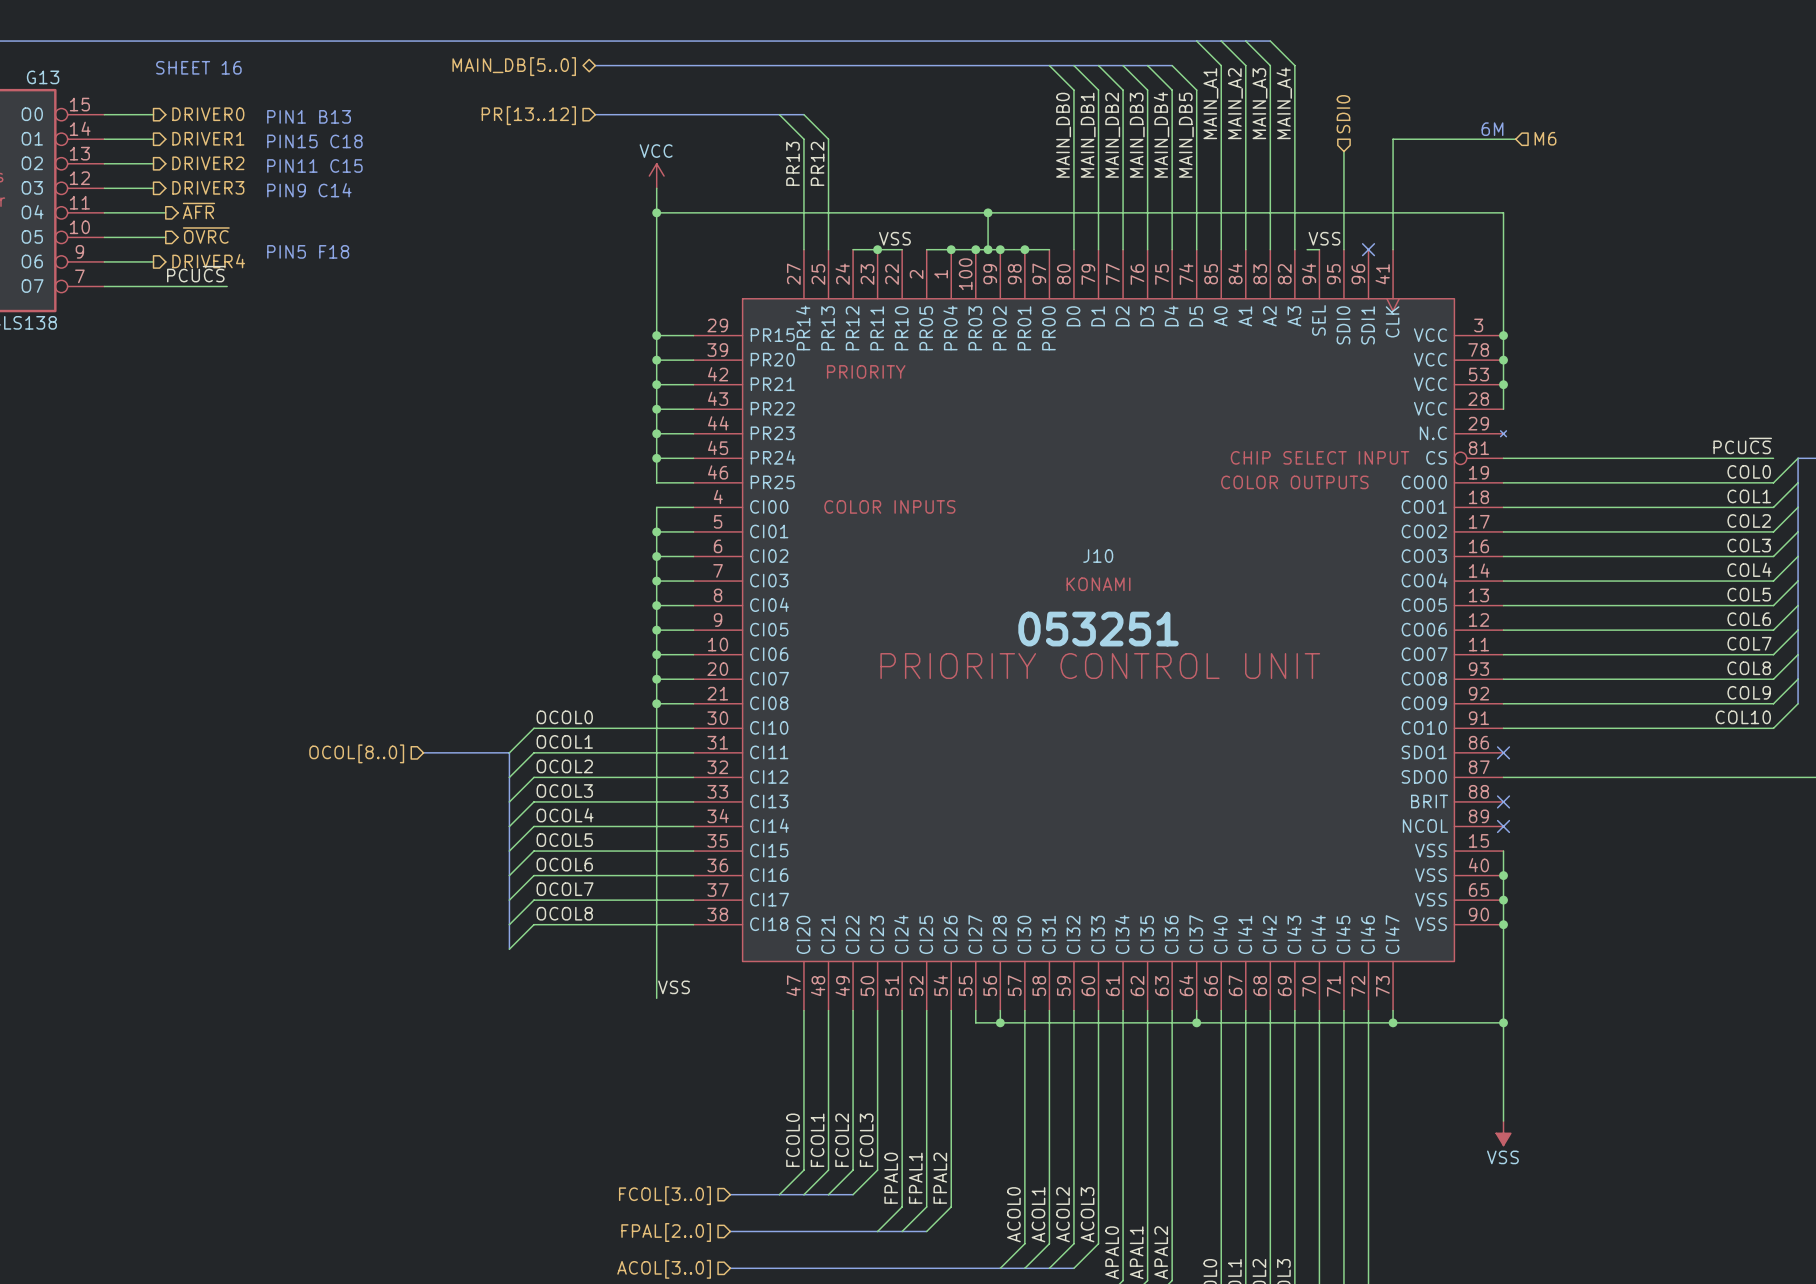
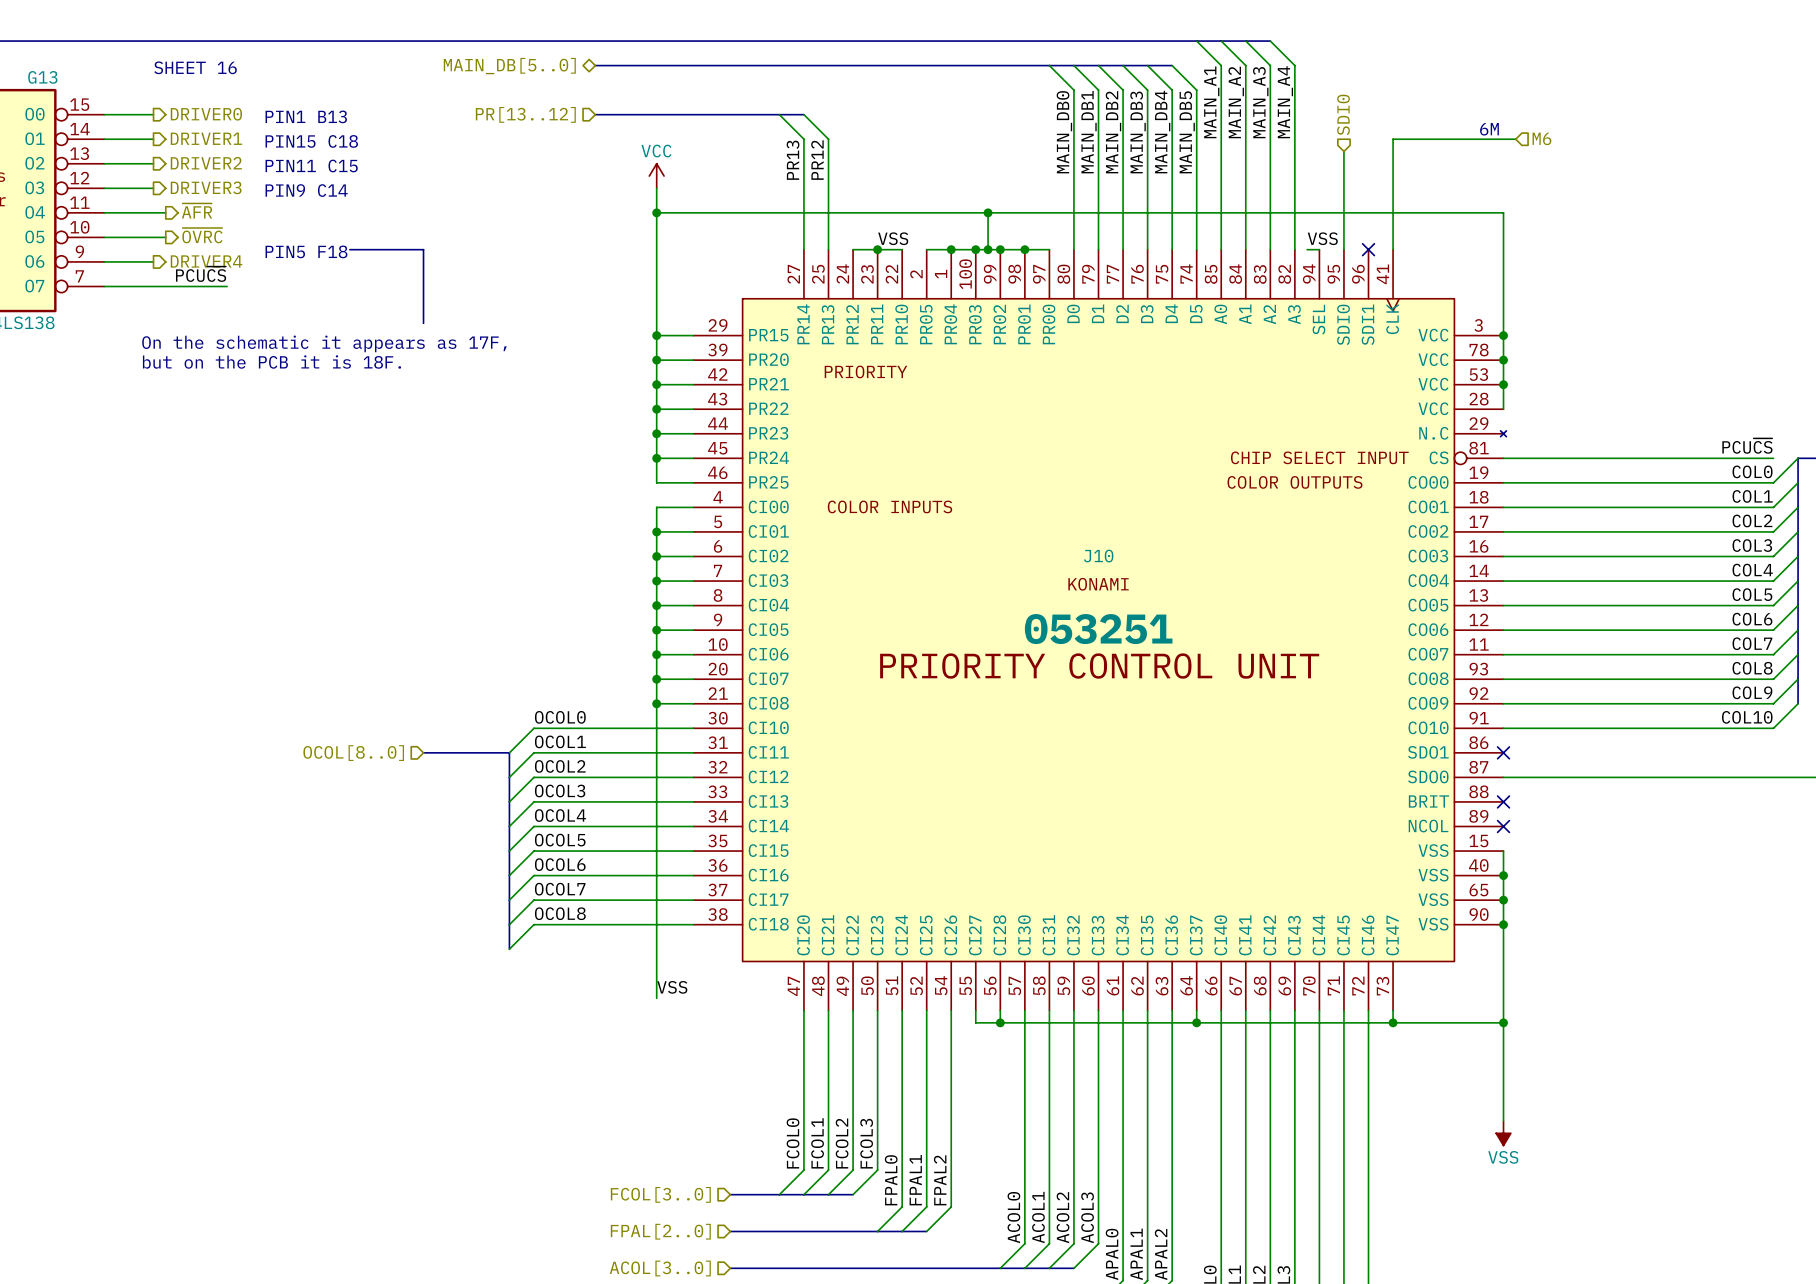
line: none -> (349, 249) (423, 249) (423, 323)
text: none -> On the schematic it appears as 17F, (324, 343)
text: none -> but on the PCB it is 18F. (271, 362)

